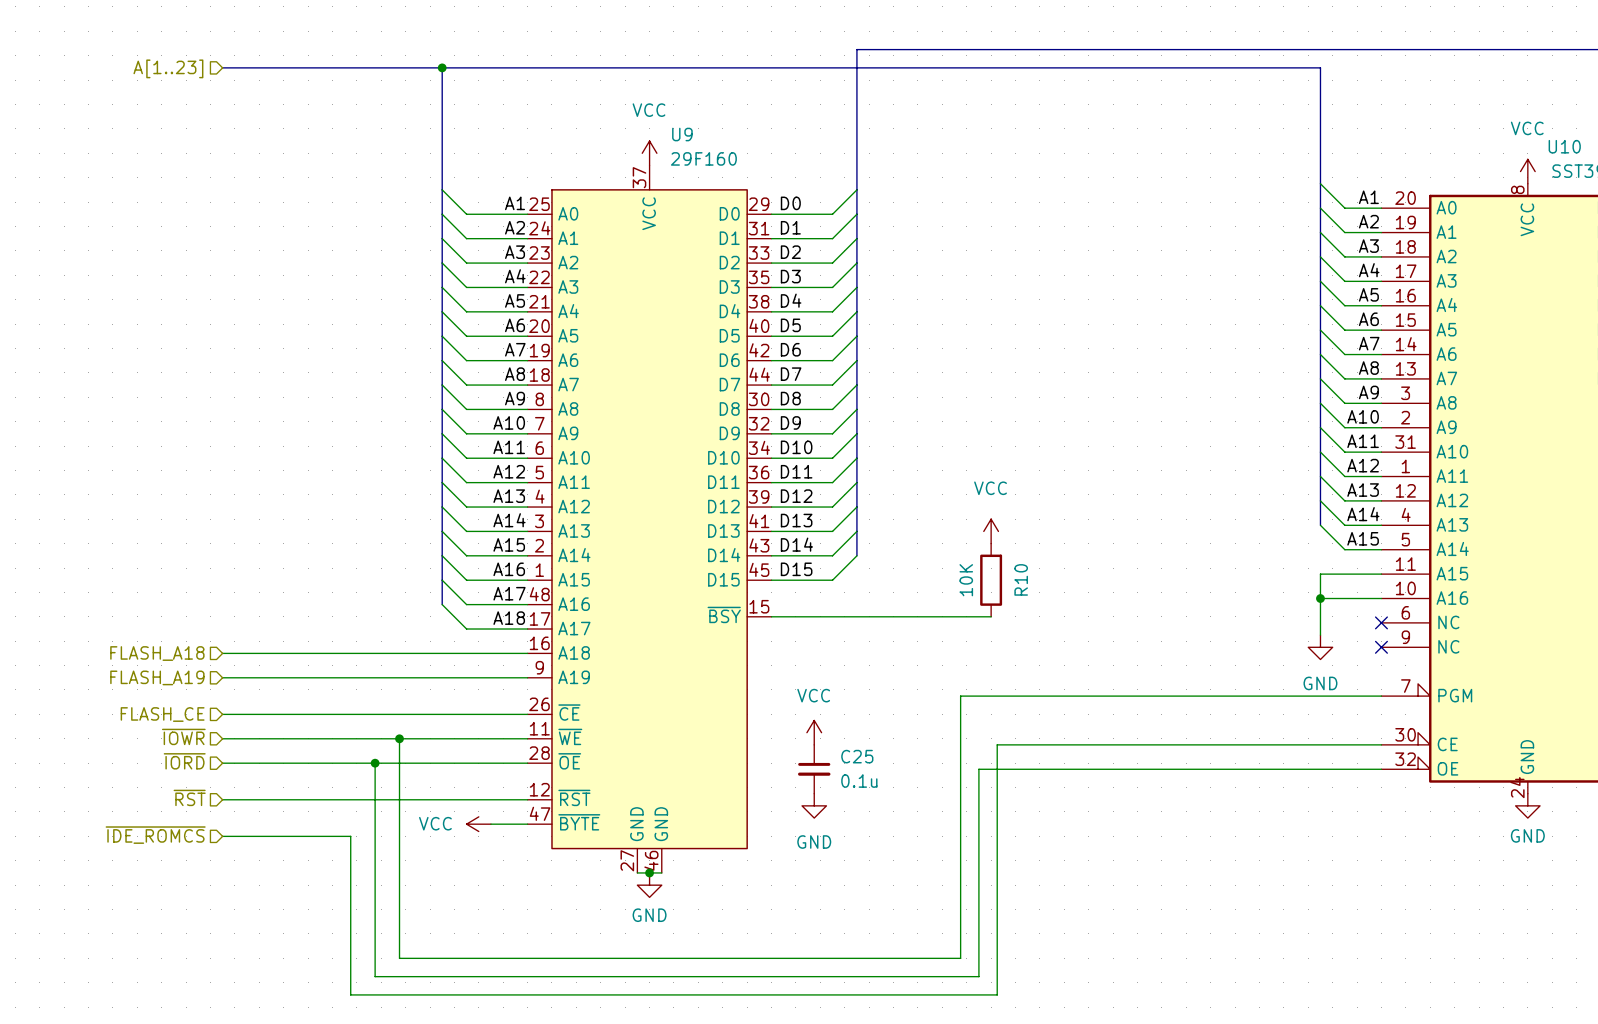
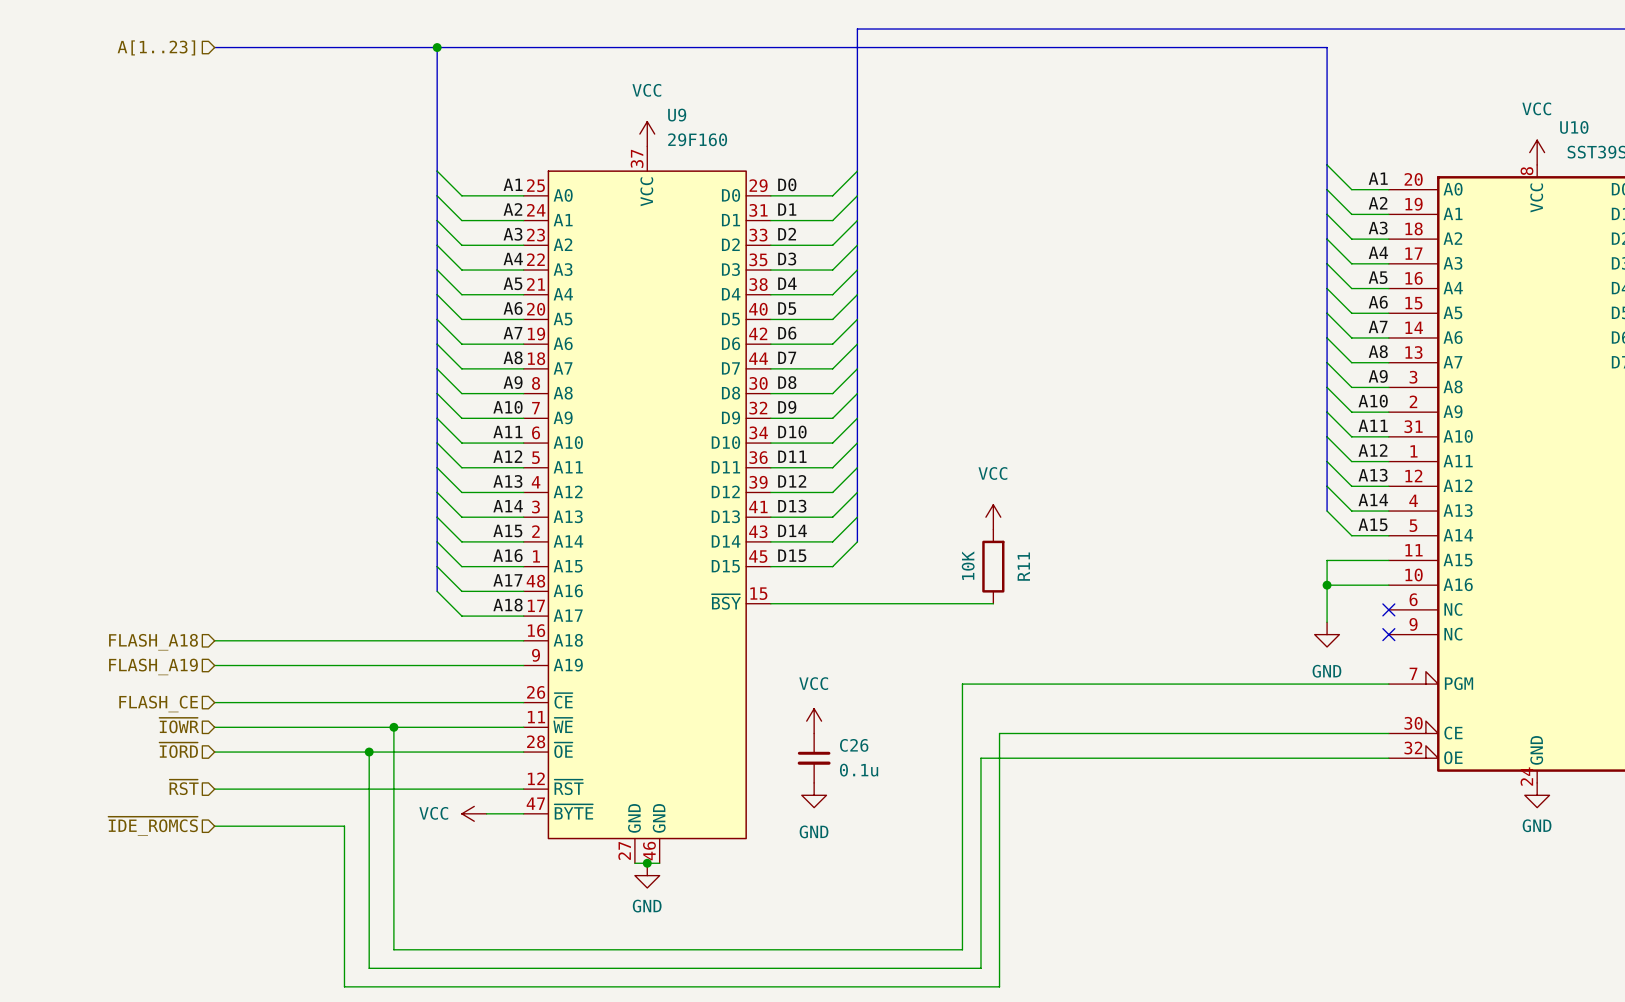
R10 name: R10 (1021, 579) -> R11 (1023, 566)
C25 name: C25 (857, 756) -> C26 (854, 745)

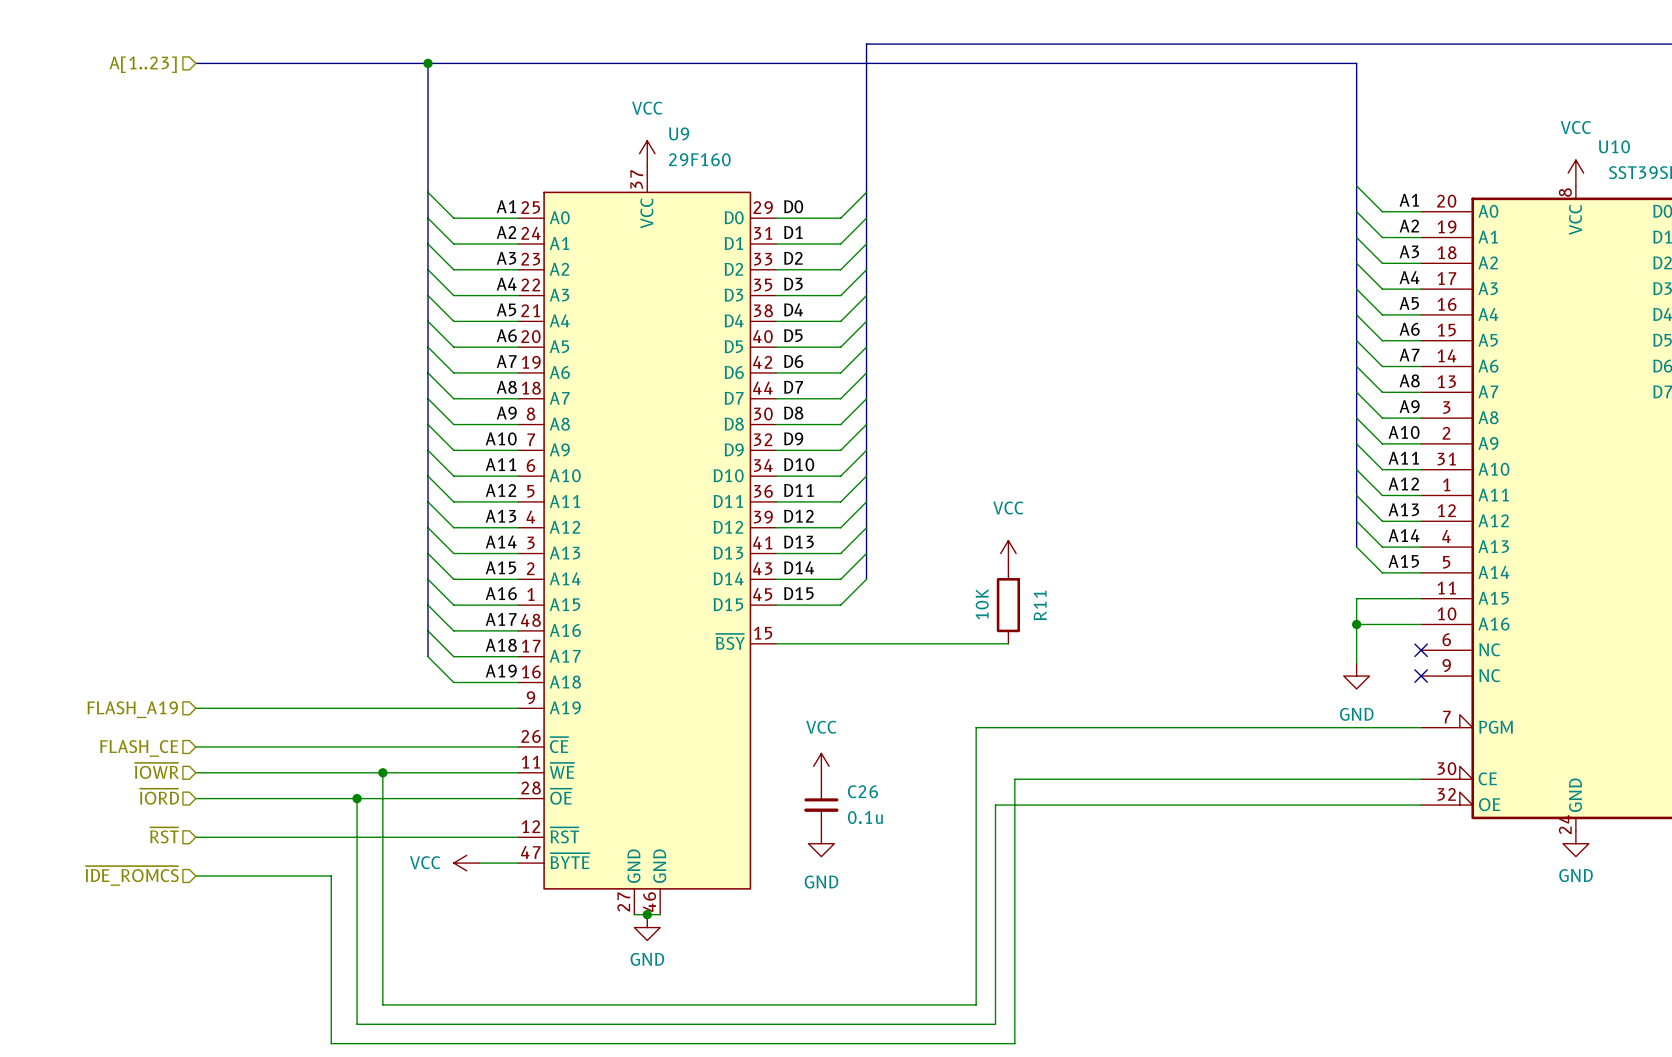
bus: none -> (428, 630) (428, 656)
label: none -> A19 (501, 671)
wire: (214, 640) (461, 640) -> (428, 656) (453, 682)
hierarchical label: FLASH_A18 (153, 642) -> none

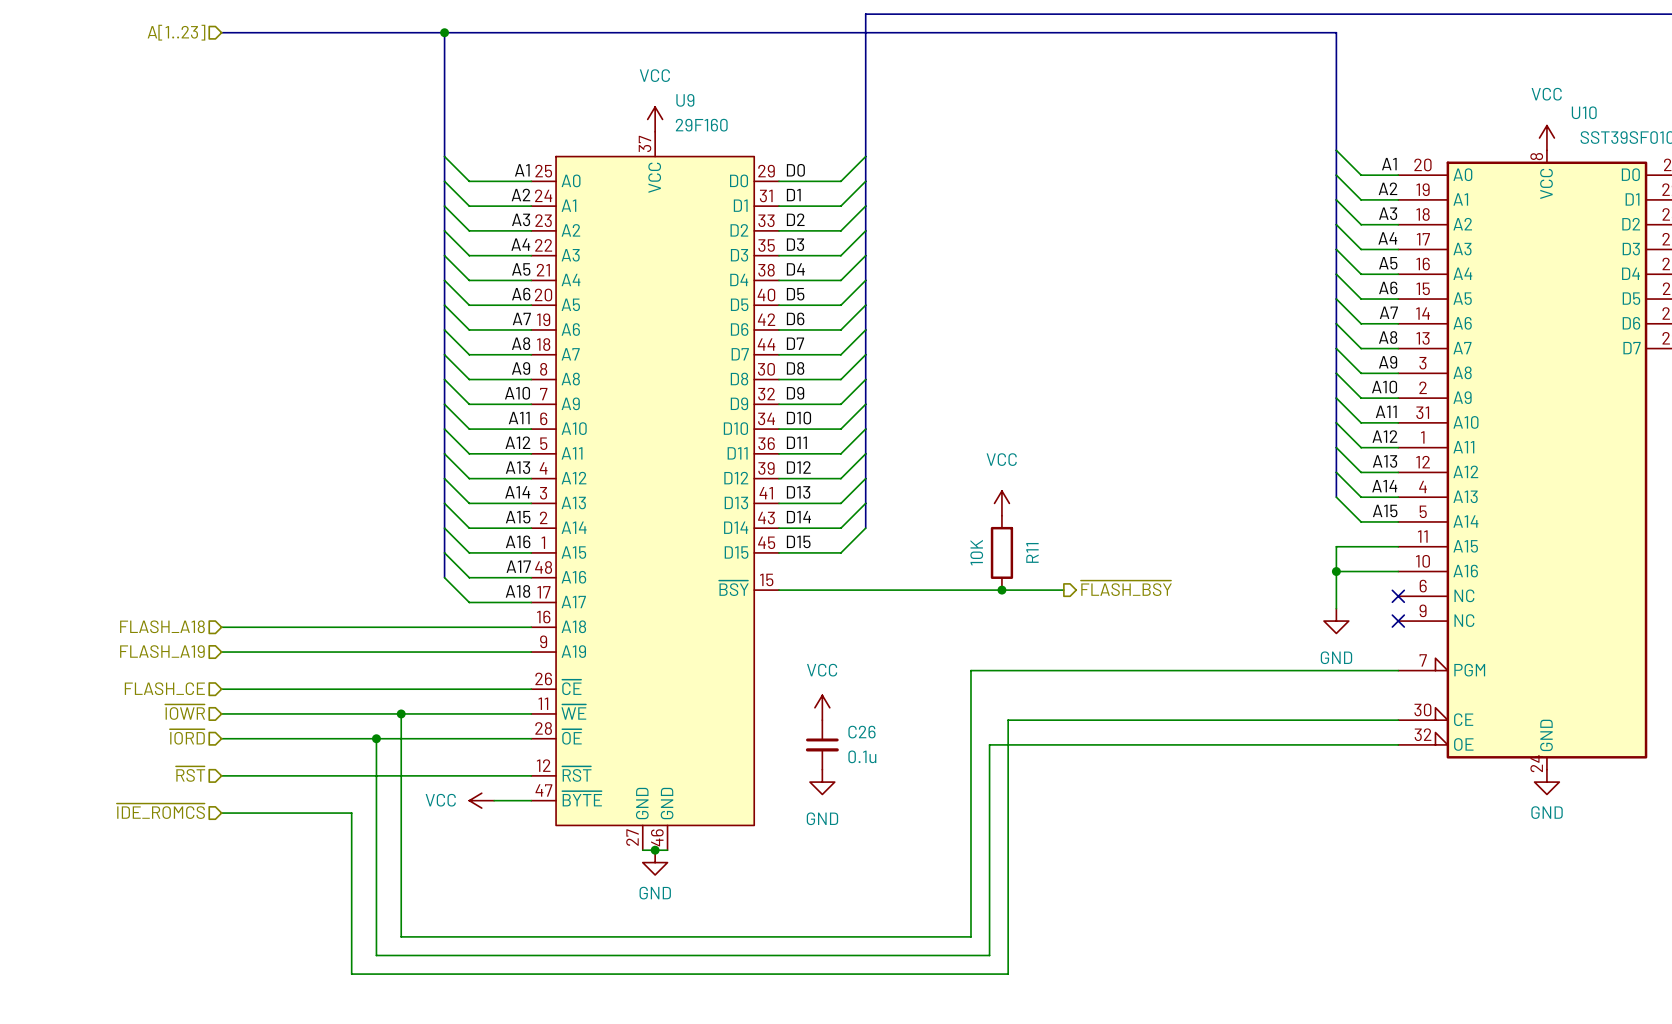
bus: (428, 630) (428, 656) -> none
wire: none -> (1001, 590) (1063, 590)
junction: none -> (1001, 590)
hierarchical label: none -> ~{FLASH_BSY} (1126, 588)
wire: (428, 656) (453, 682) -> (221, 627) (469, 627)
label: A19 (501, 671) -> none
hierarchical label: none -> FLASH_A18 (162, 626)

